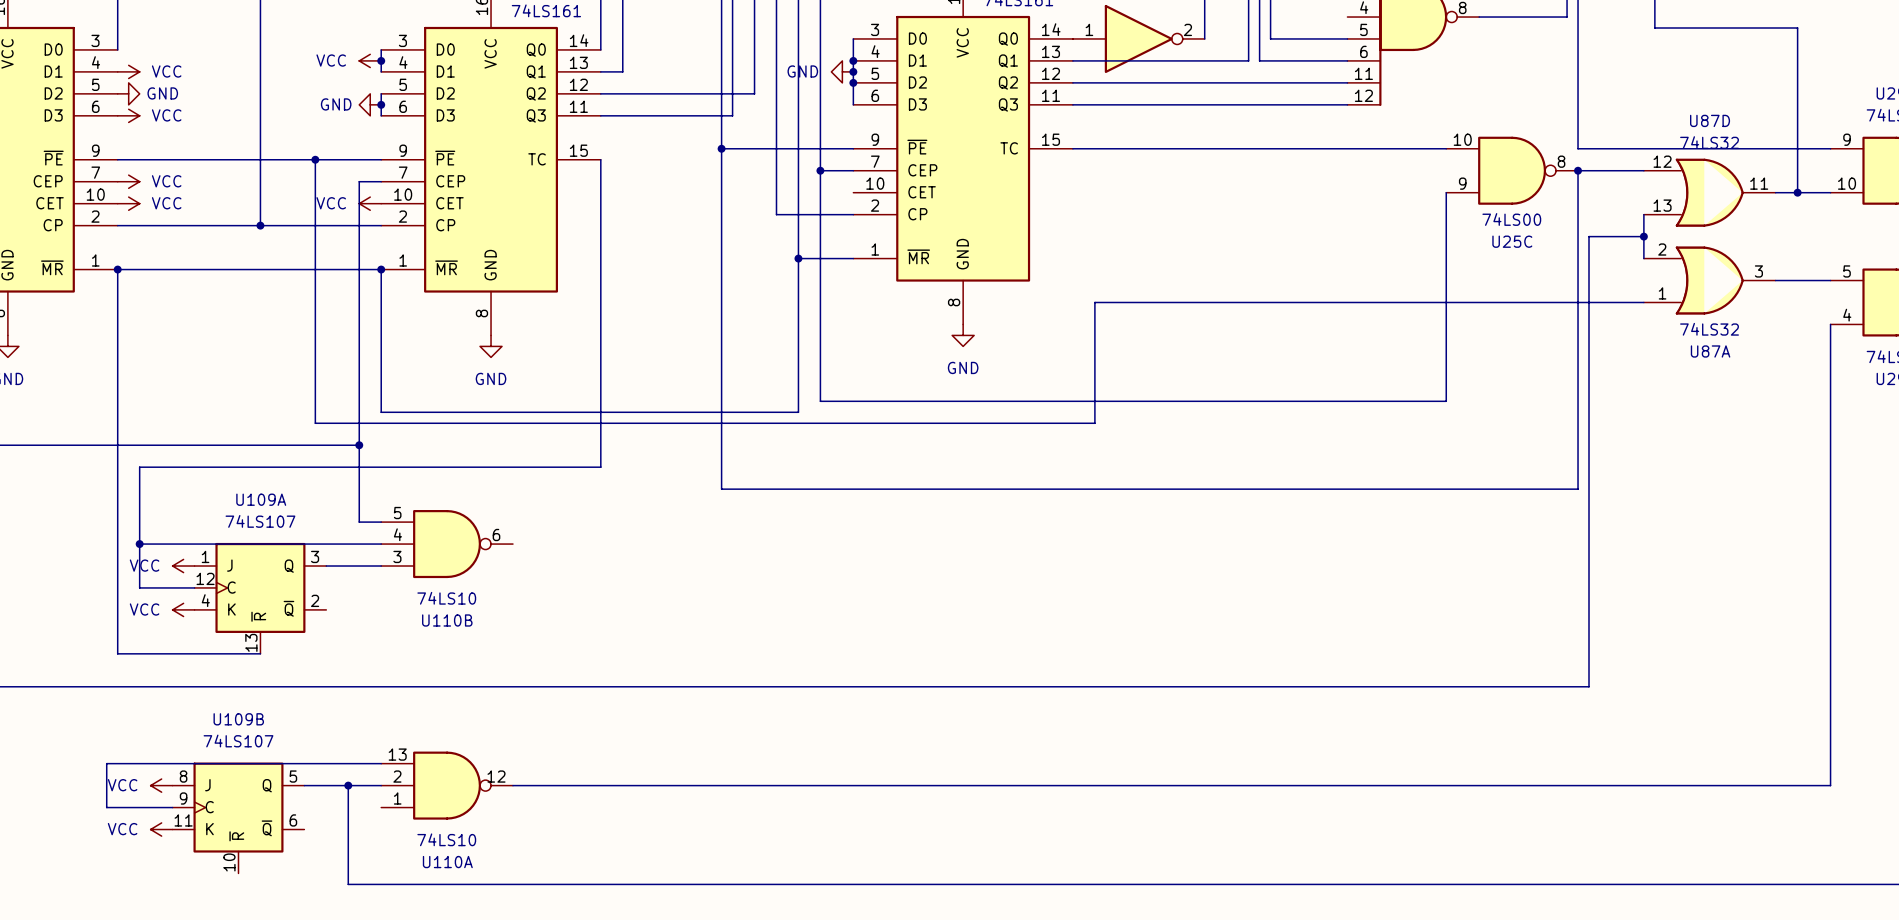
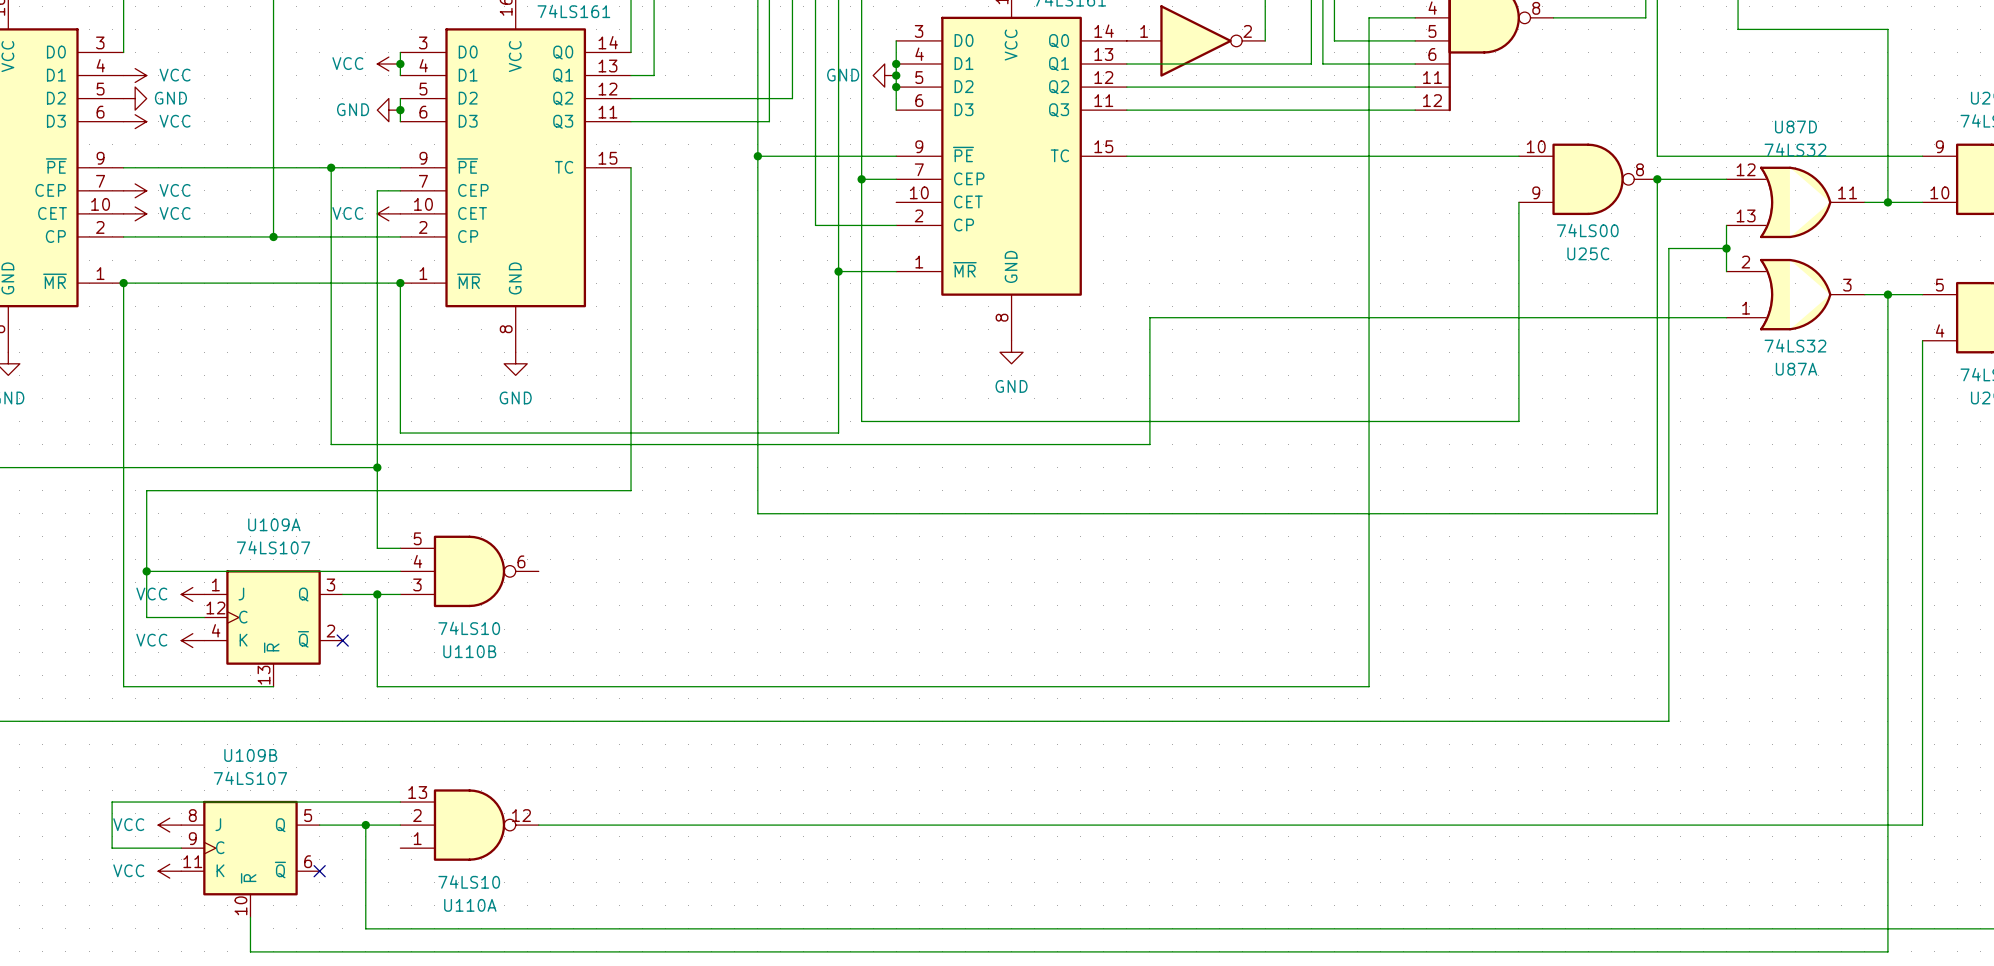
wire: none -> (1415, 17) (1369, 17) (1369, 686) (377, 686) (377, 594)
wire: none -> (1887, 294) (1887, 951) (250, 951) (250, 917)
junction: none -> (1887, 294)
junction: none -> (377, 594)
no-connect mark: none -> (342, 640)
no-connect mark: none -> (319, 871)

